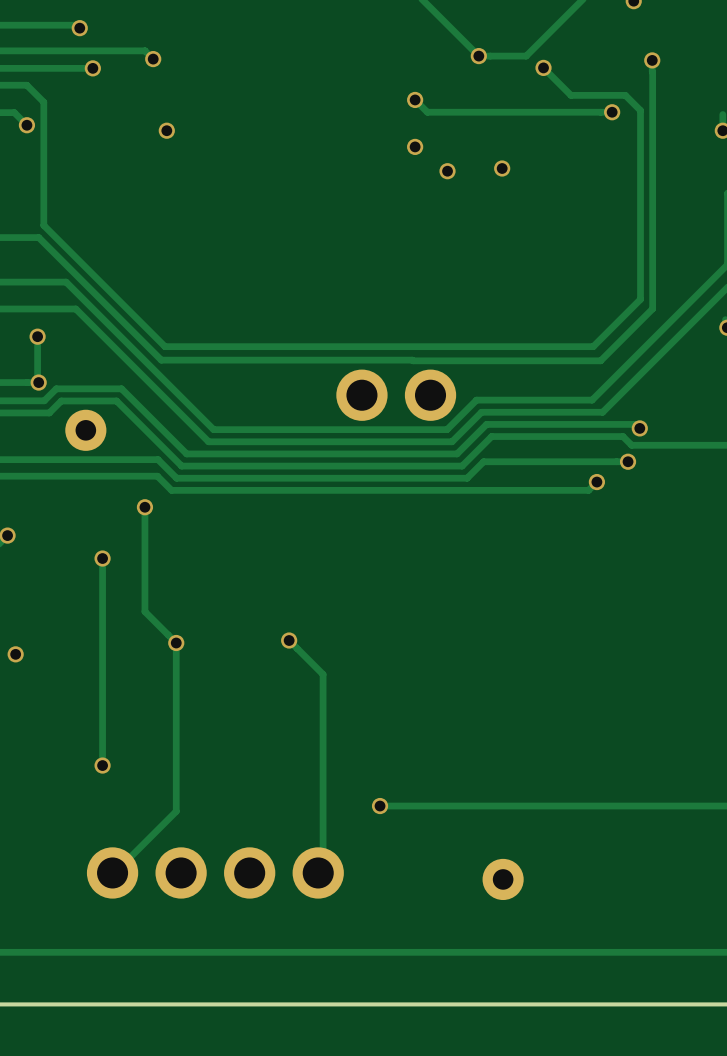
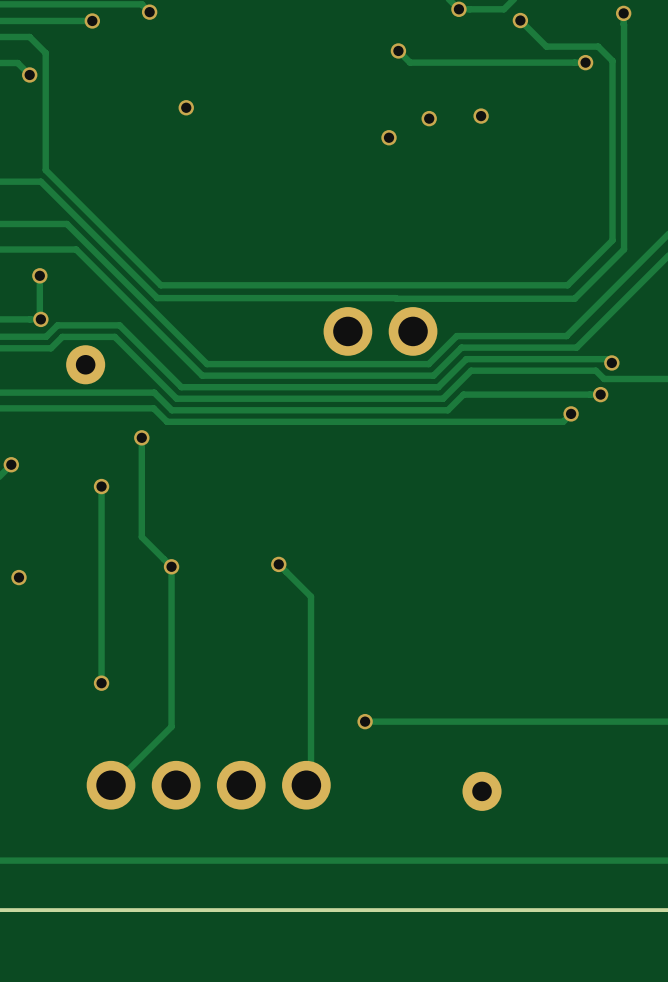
via position: (166, 130) -> (186, 107)
via position: (415, 146) -> (389, 137)

